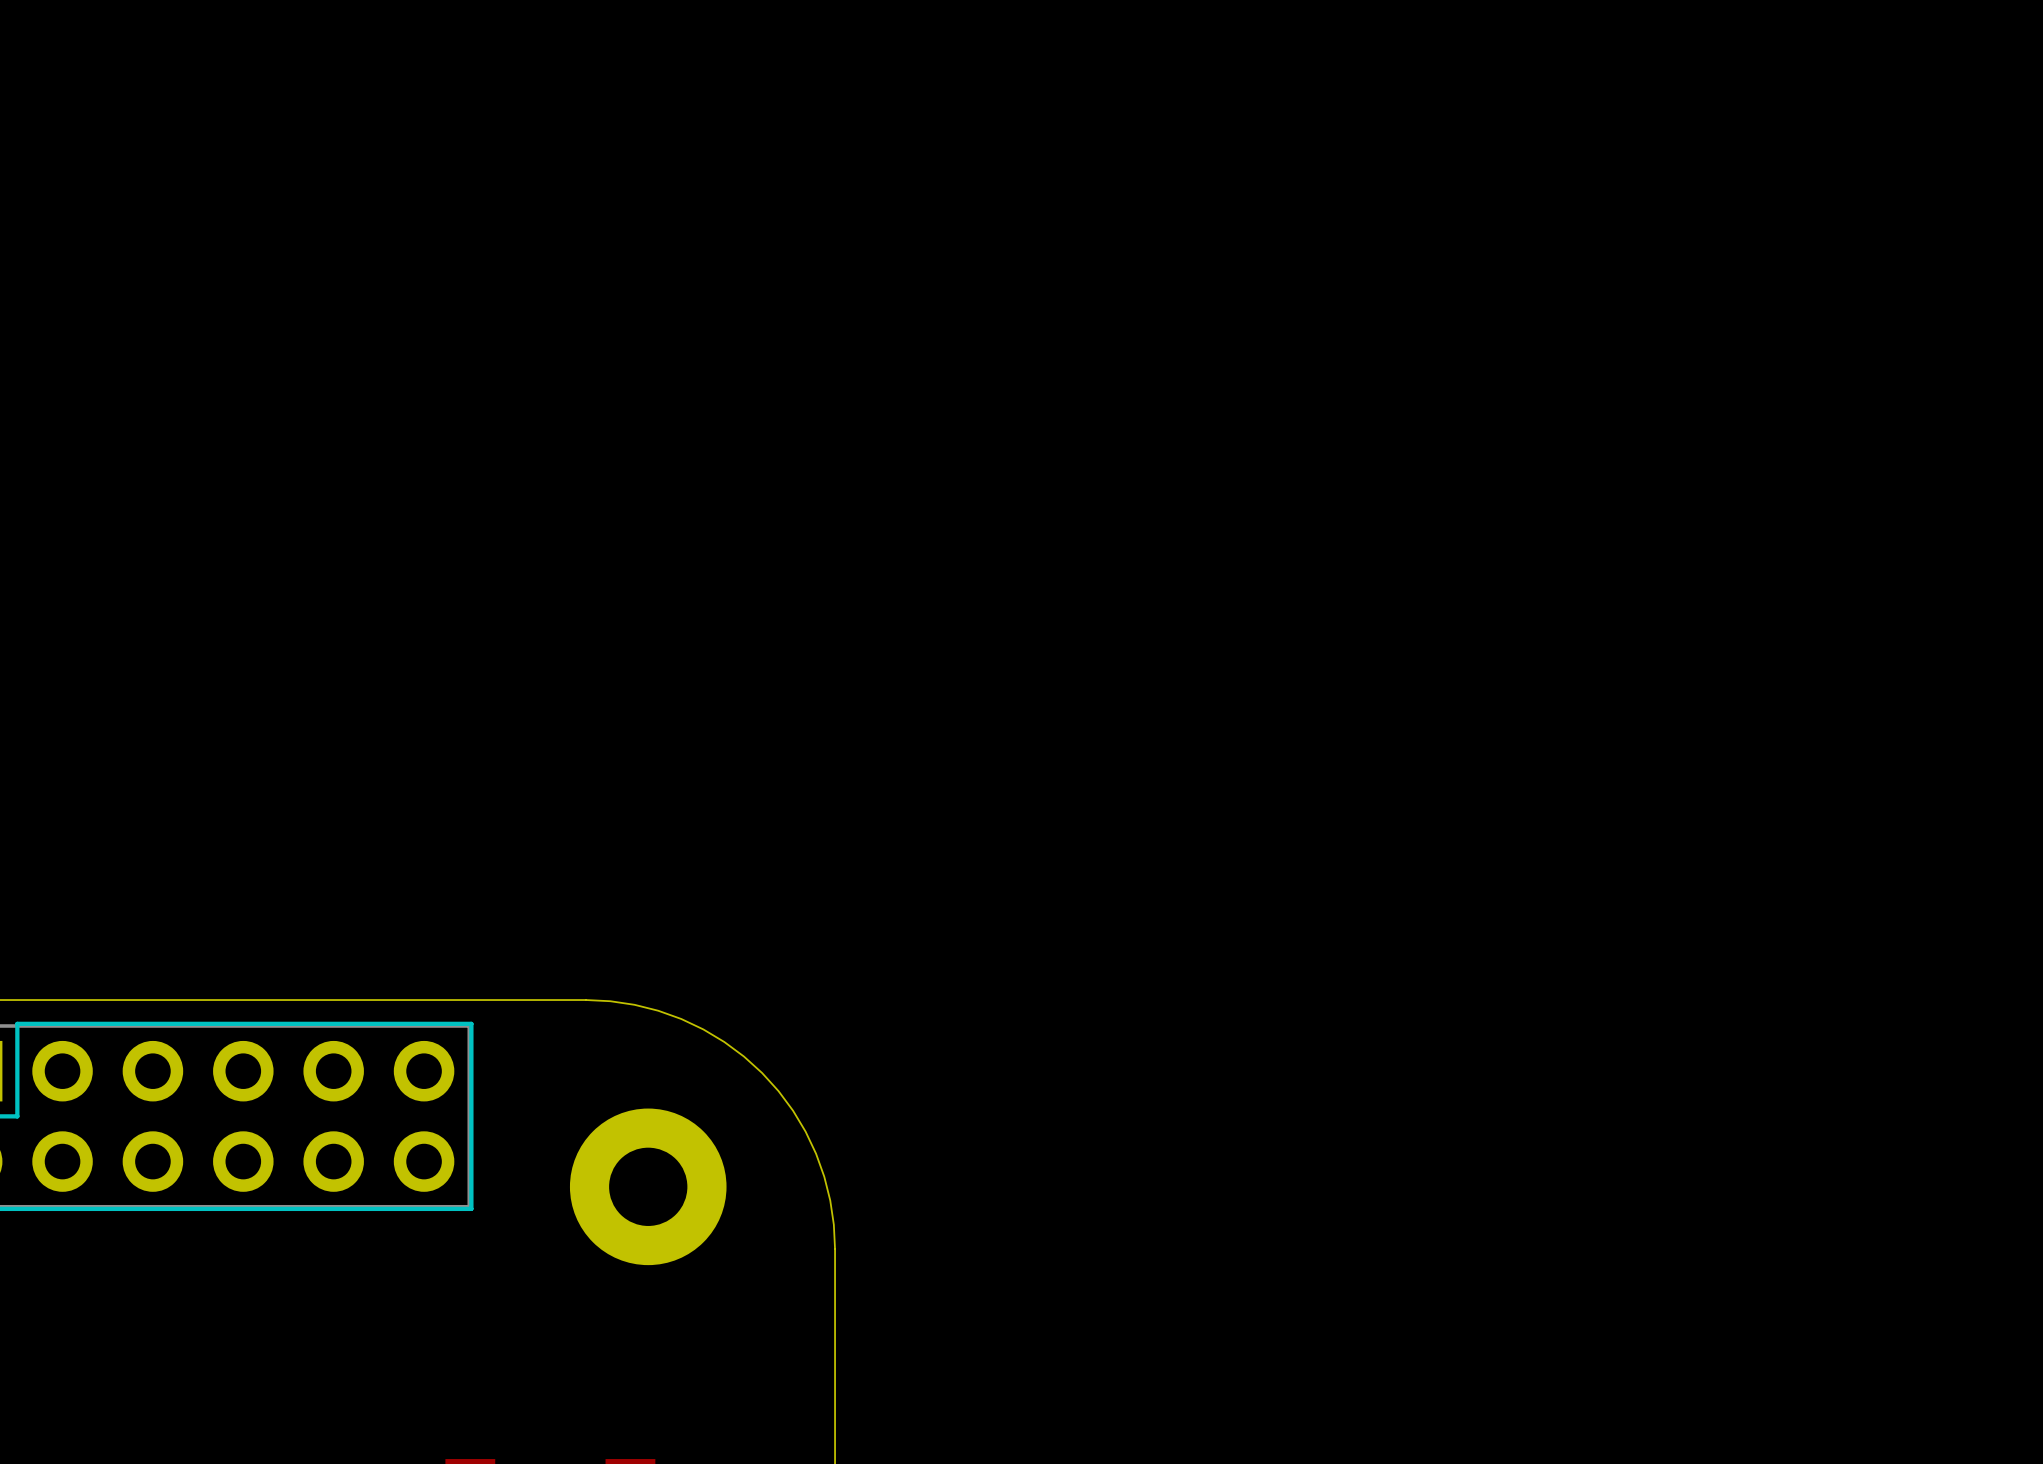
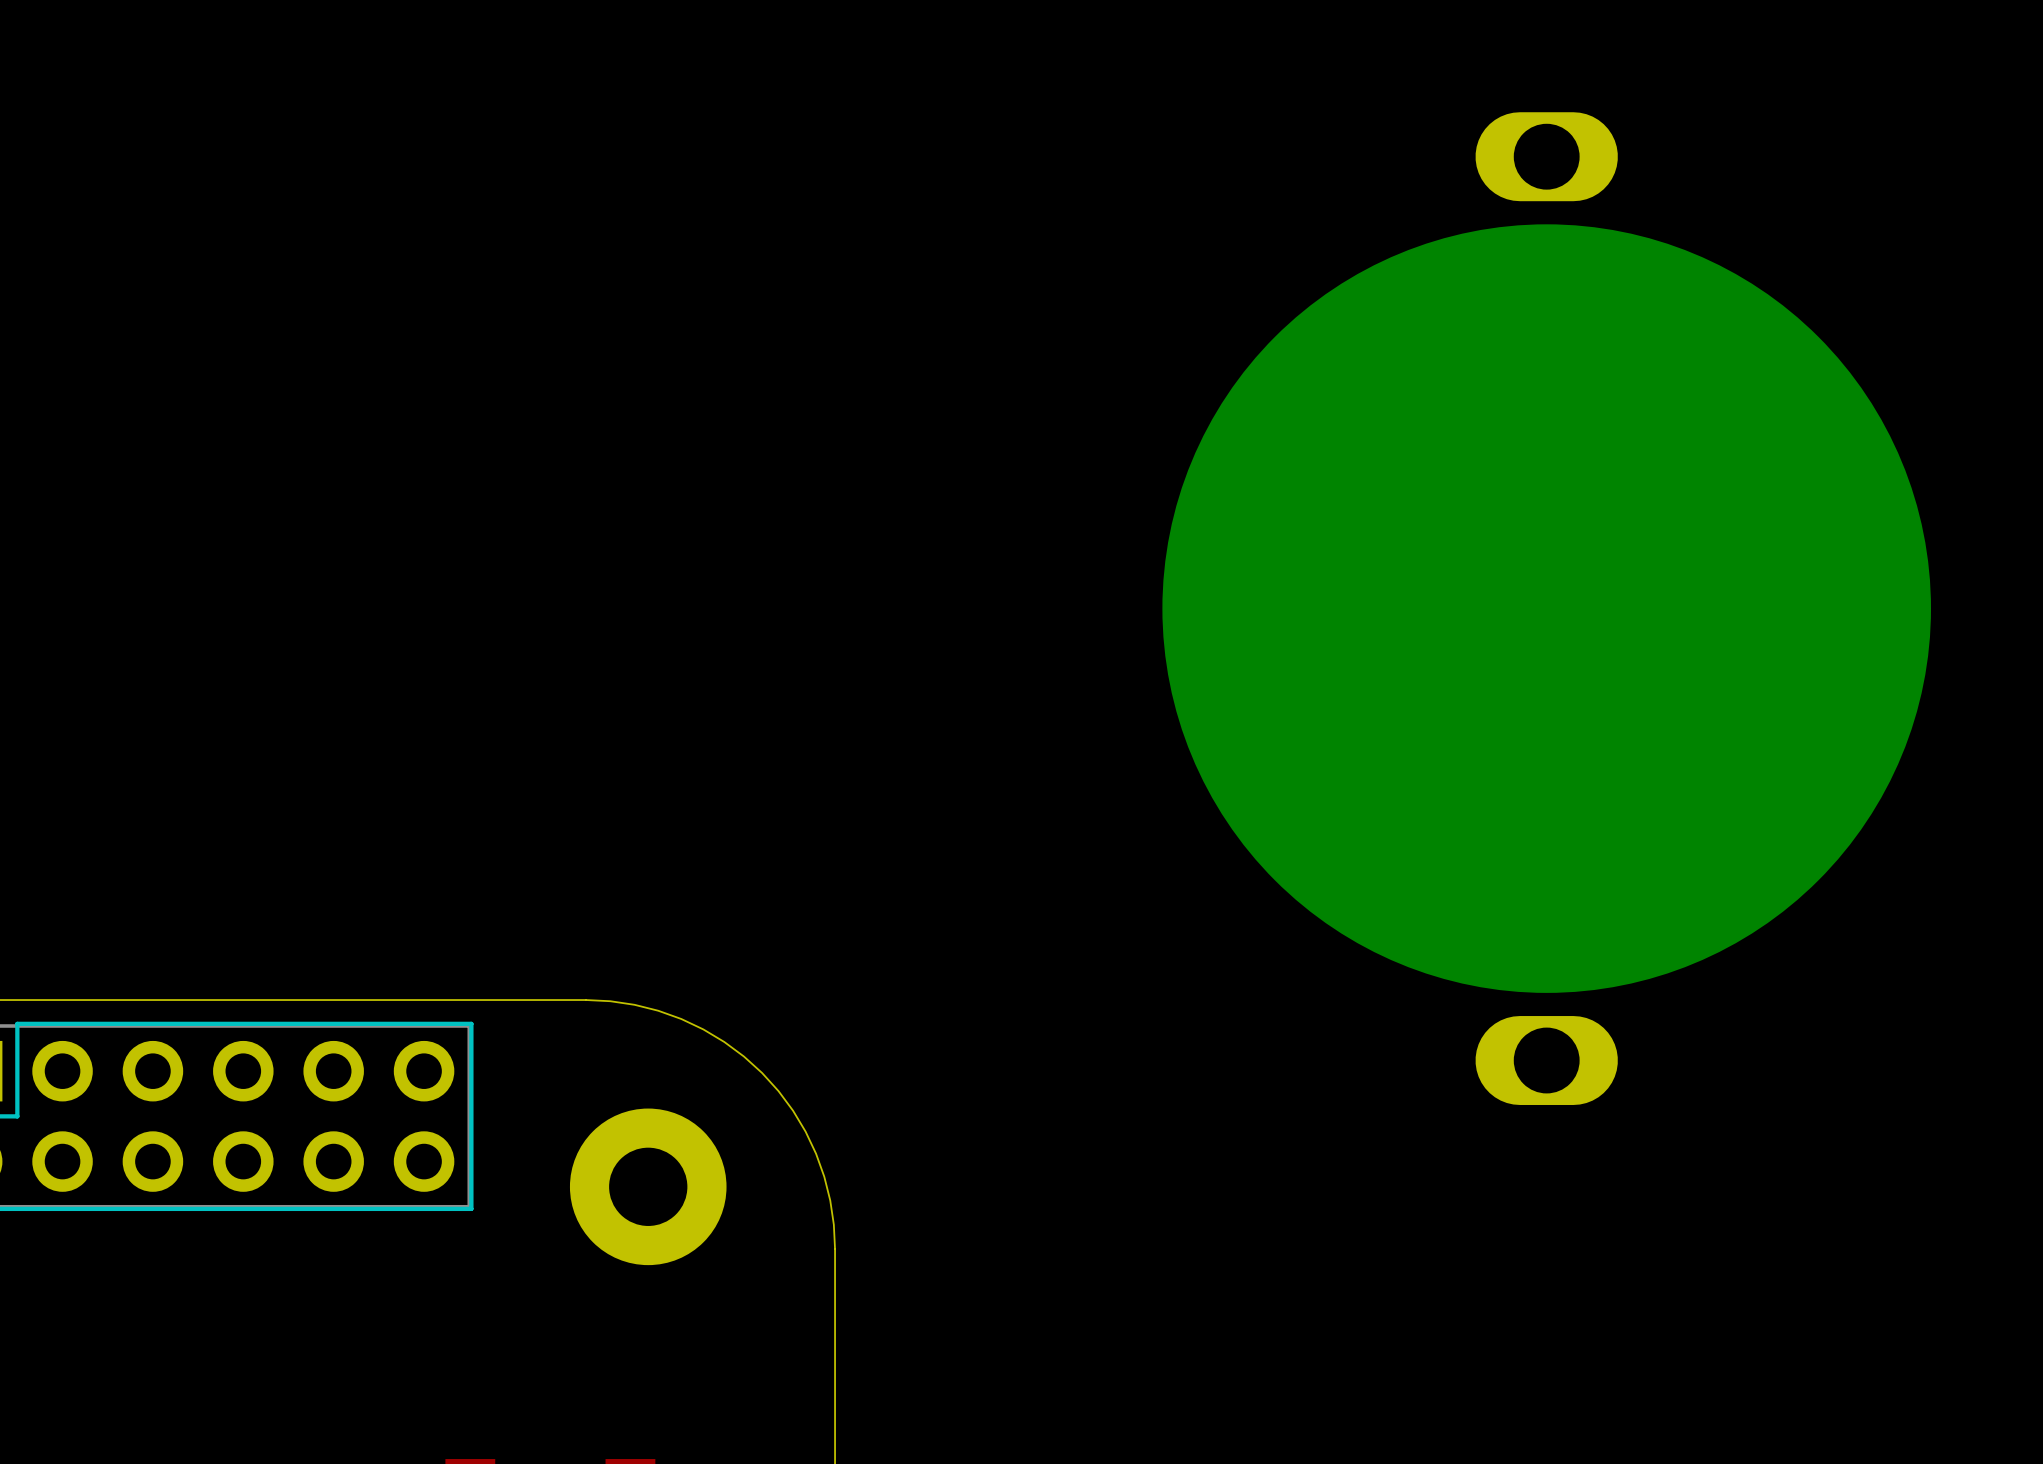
part: none -> (1546, 608)

